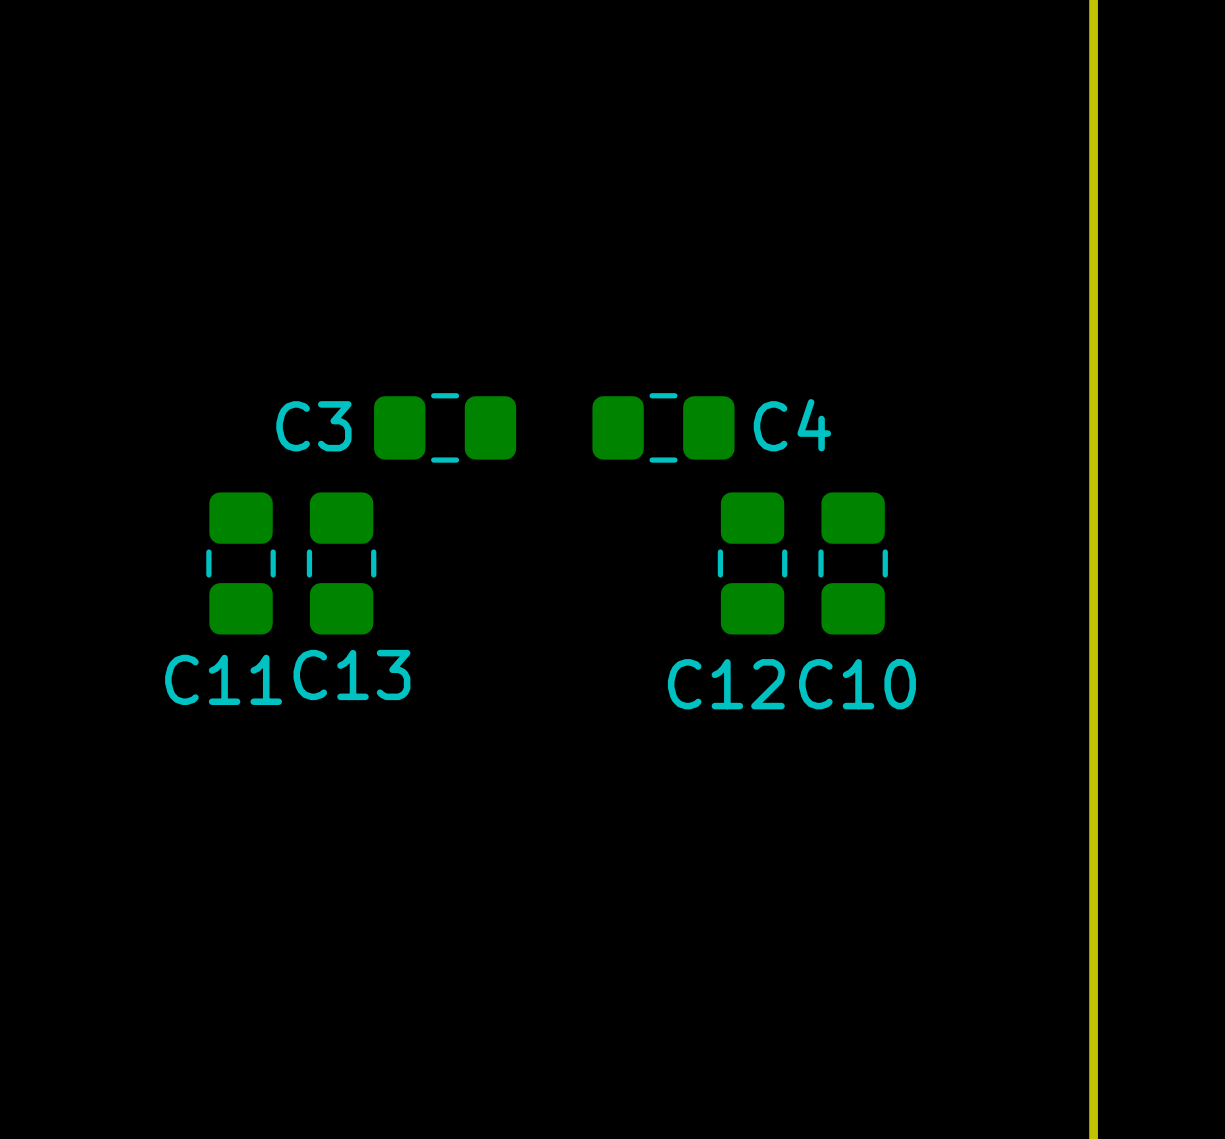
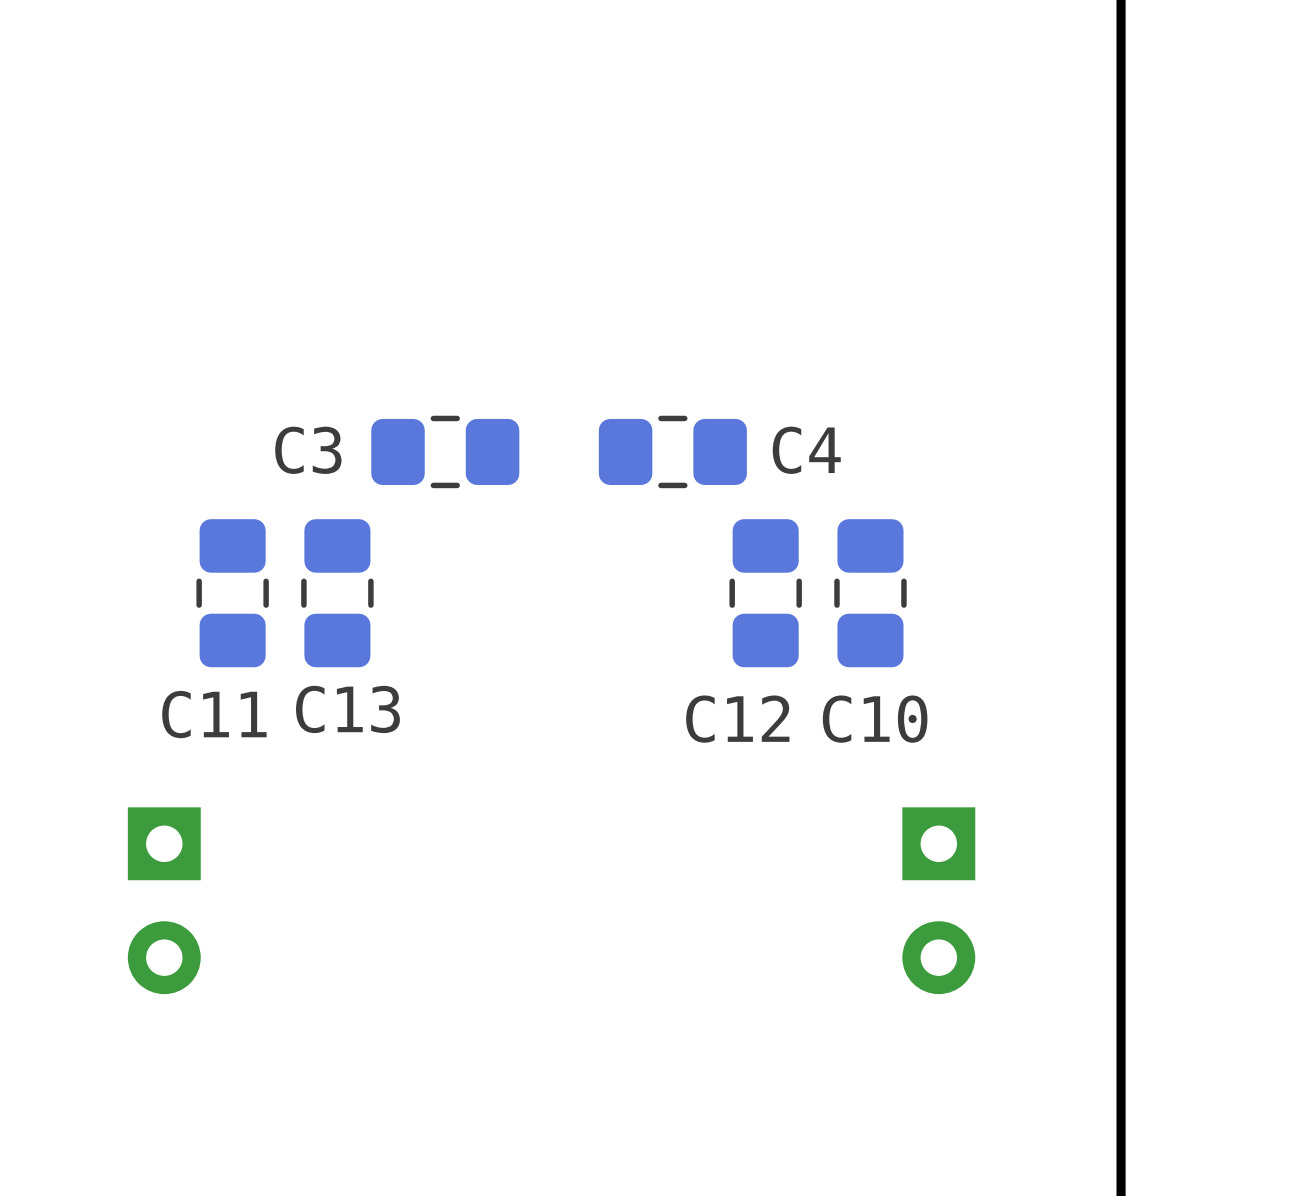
part: none -> (164, 900)
part: none -> (938, 900)

